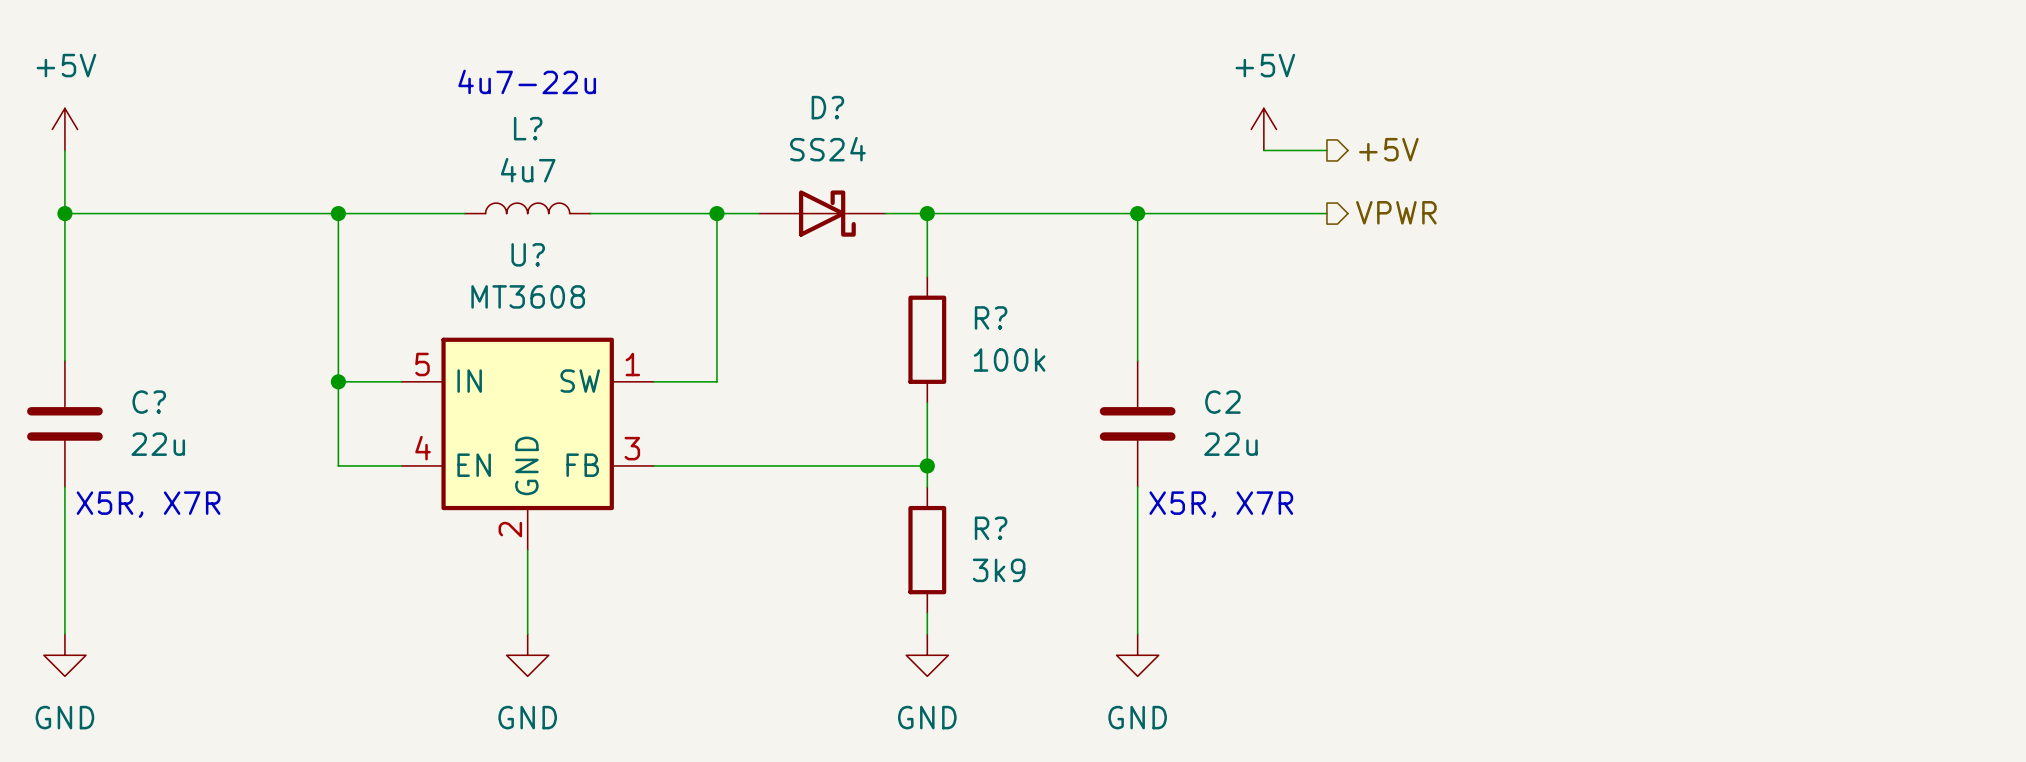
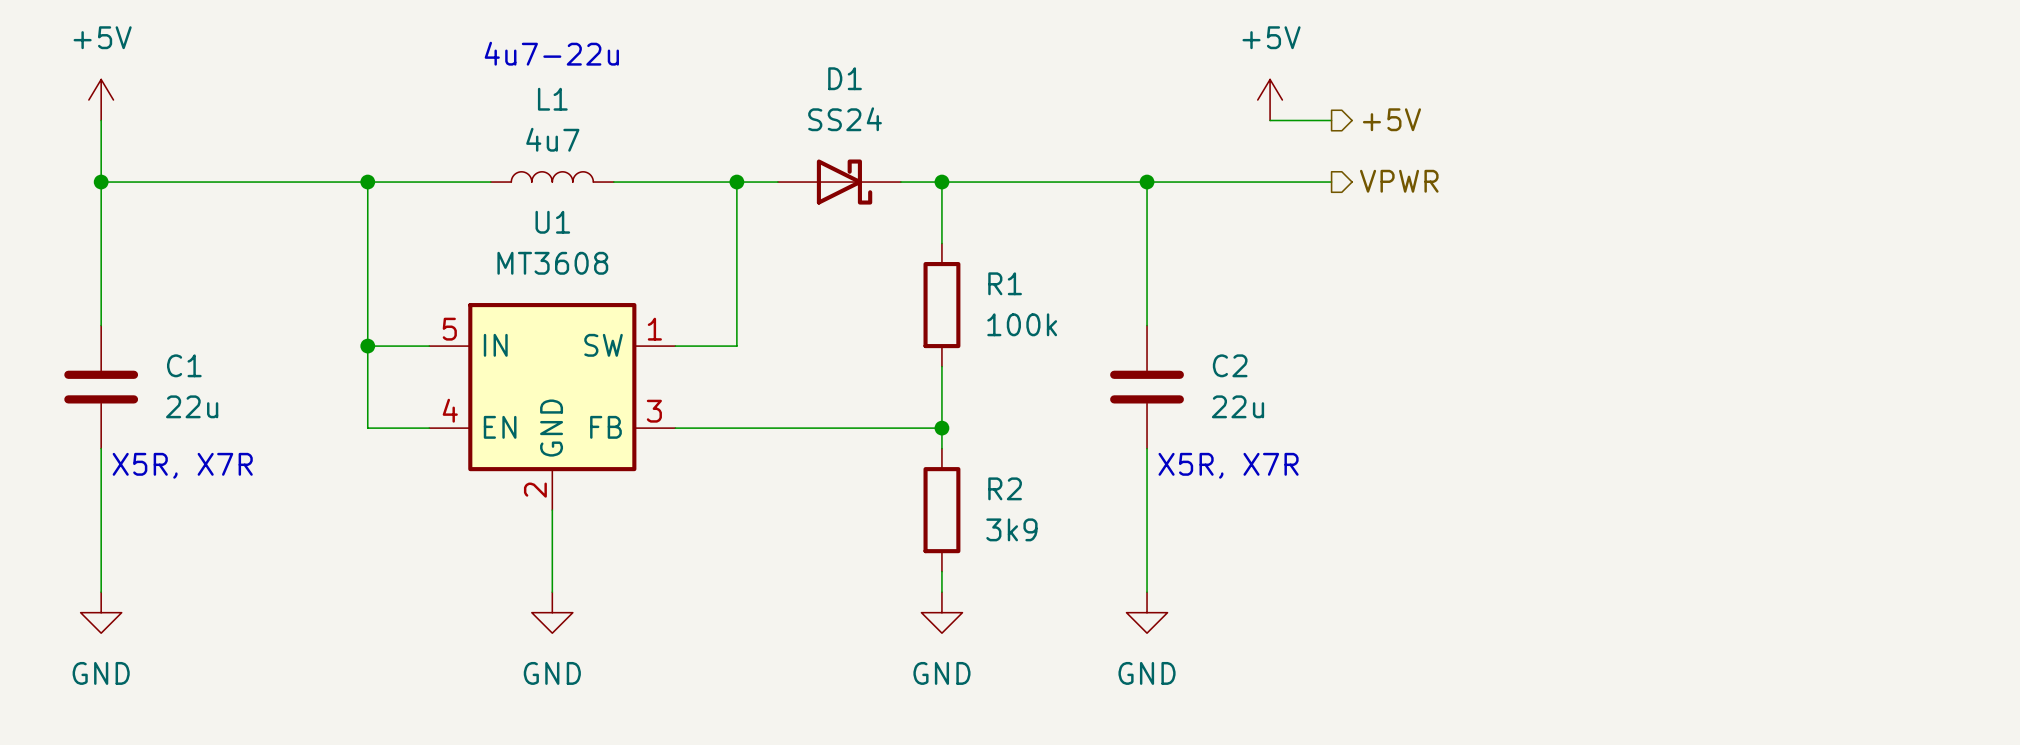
D? name: D? (827, 107) -> D1 (845, 78)
L? name: L? (528, 128) -> L1 (552, 99)
U? name: U? (528, 254) -> U1 (552, 222)
R? name: R? (991, 317) -> R1 (1005, 283)
C? name: C? (149, 402) -> C1 (184, 365)
R? name: R? (991, 528) -> R2 (1005, 488)

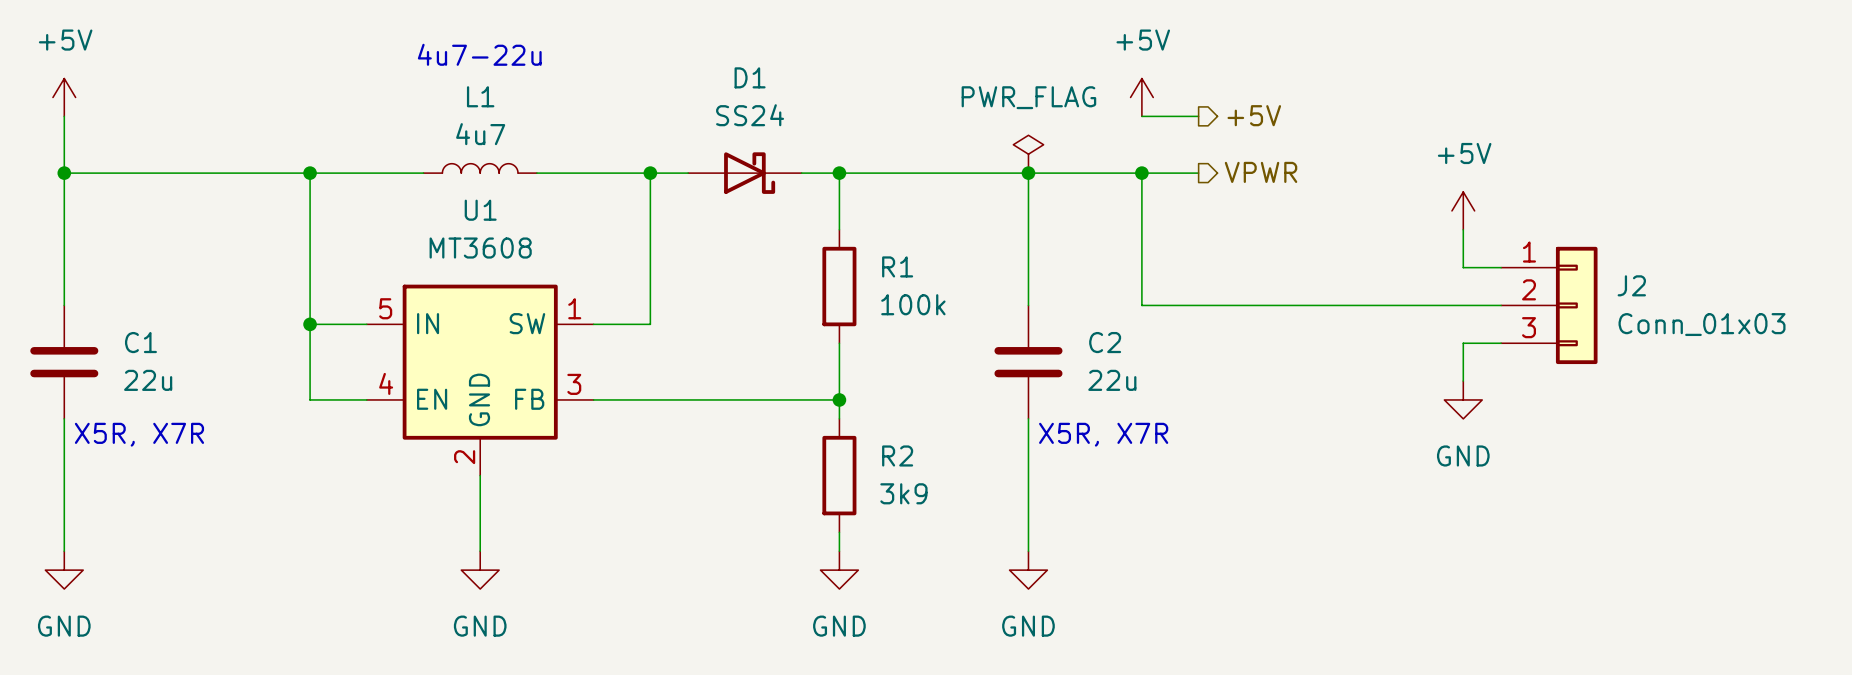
power symbol: none -> PWR_FLAG (1028, 154)
wire: none -> (1141, 173) (1141, 305) (1501, 305)
junction: none -> (1141, 173)
power symbol: none -> +5V (1463, 210)
wire: none -> (1463, 229) (1463, 267) (1501, 267)
J2: none -> Conn_01x03 (1549, 305)
wire: none -> (1501, 343) (1463, 343) (1463, 381)
power symbol: none -> GND (1463, 399)

